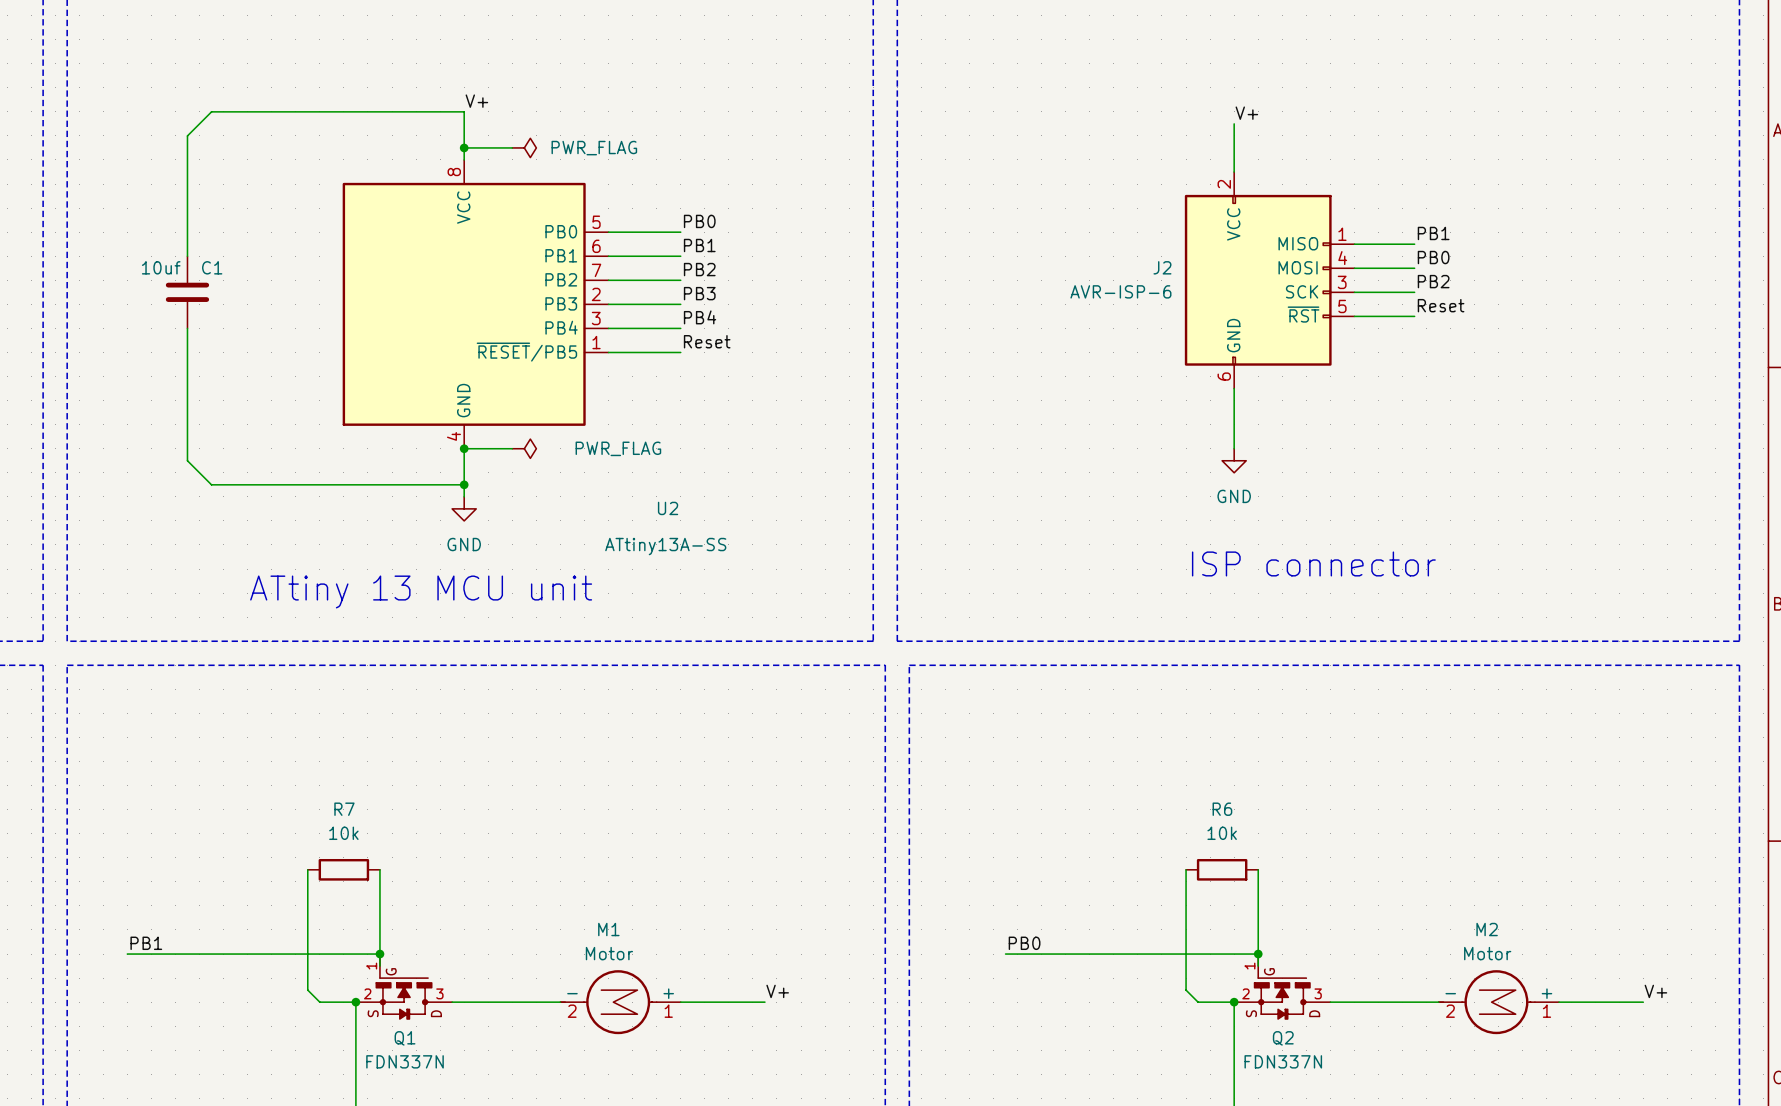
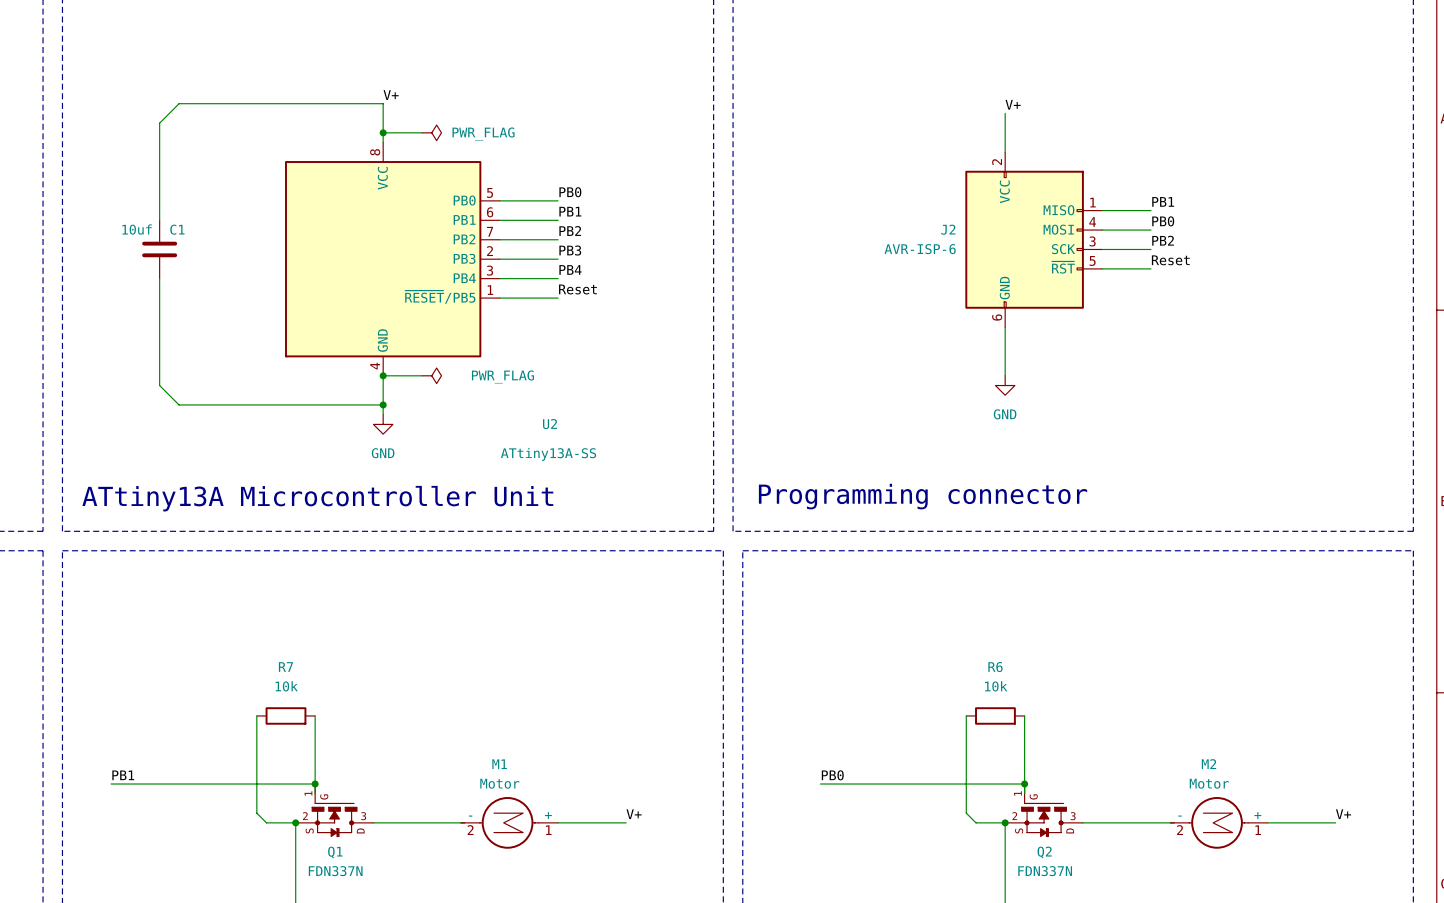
text: ISP connector (1313, 563) -> none
text: ATtiny 13 MCU unit (421, 591) -> none
text: none -> Programming connector (923, 496)
text: none -> ATtiny13A Microcontroller Unit (317, 498)

